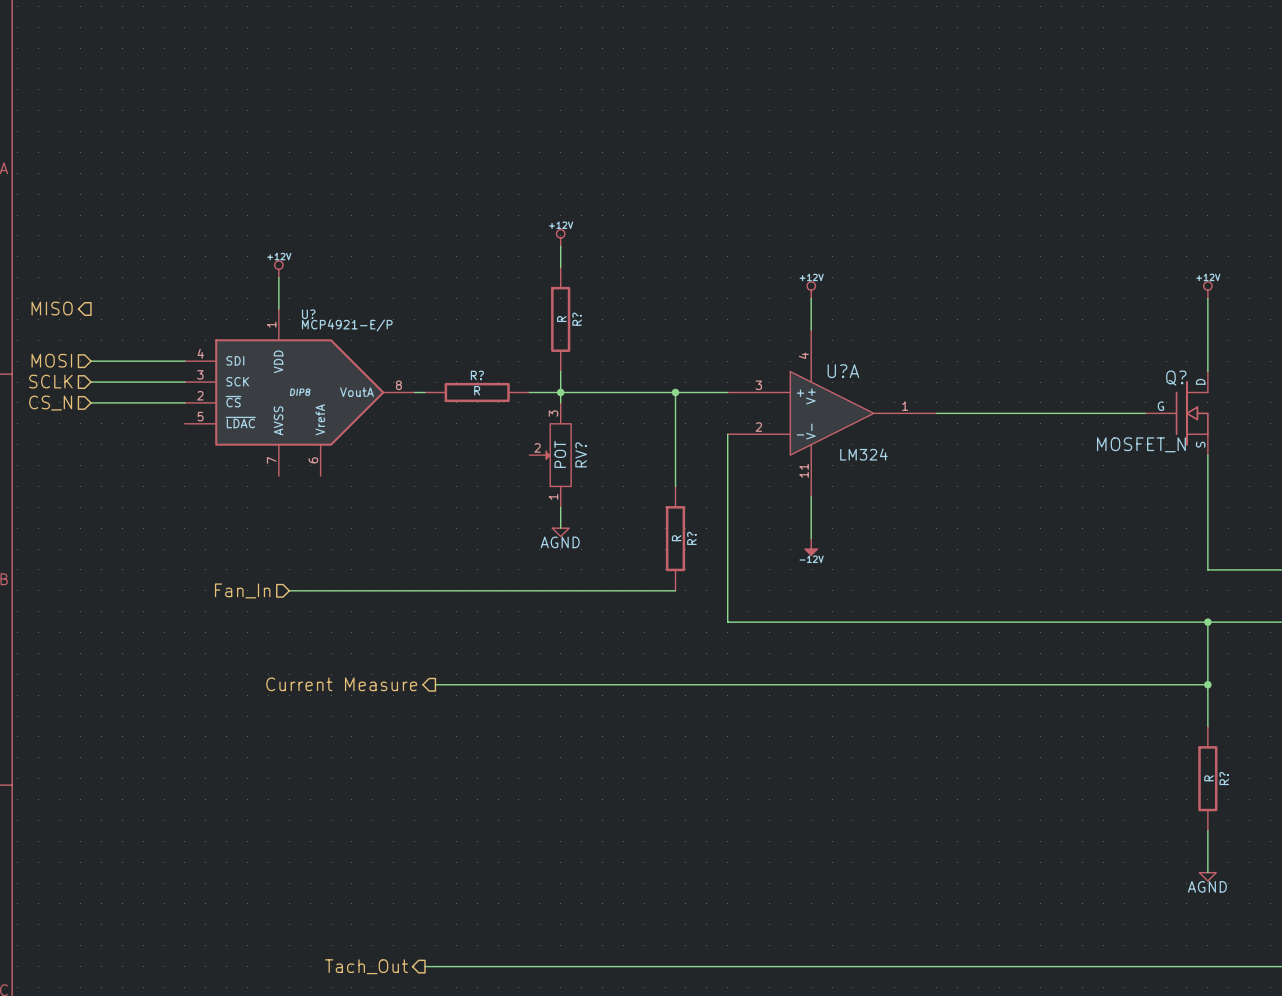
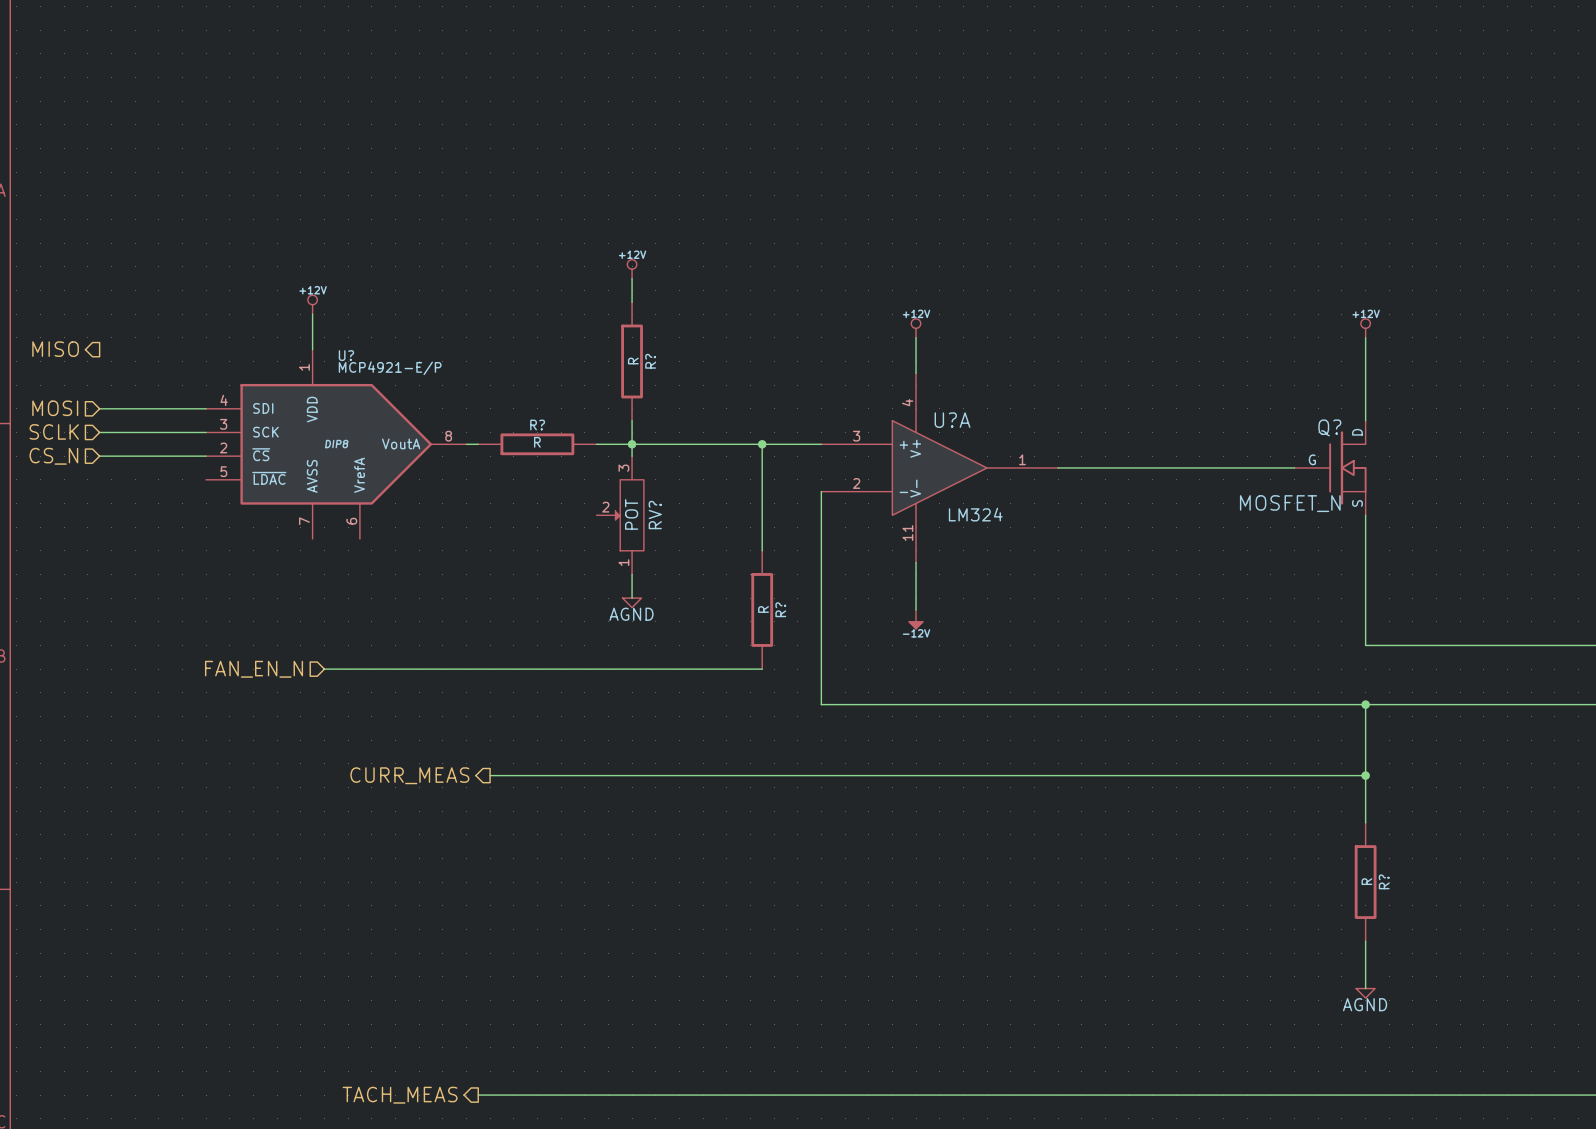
hierarchical label: Fan_In (242, 590) -> FAN_EN_N (254, 669)
hierarchical label: Current Measure (341, 684) -> CURR_MEAS (409, 775)
hierarchical label: Tach_Out (366, 966) -> TACH_MEAS (400, 1095)

